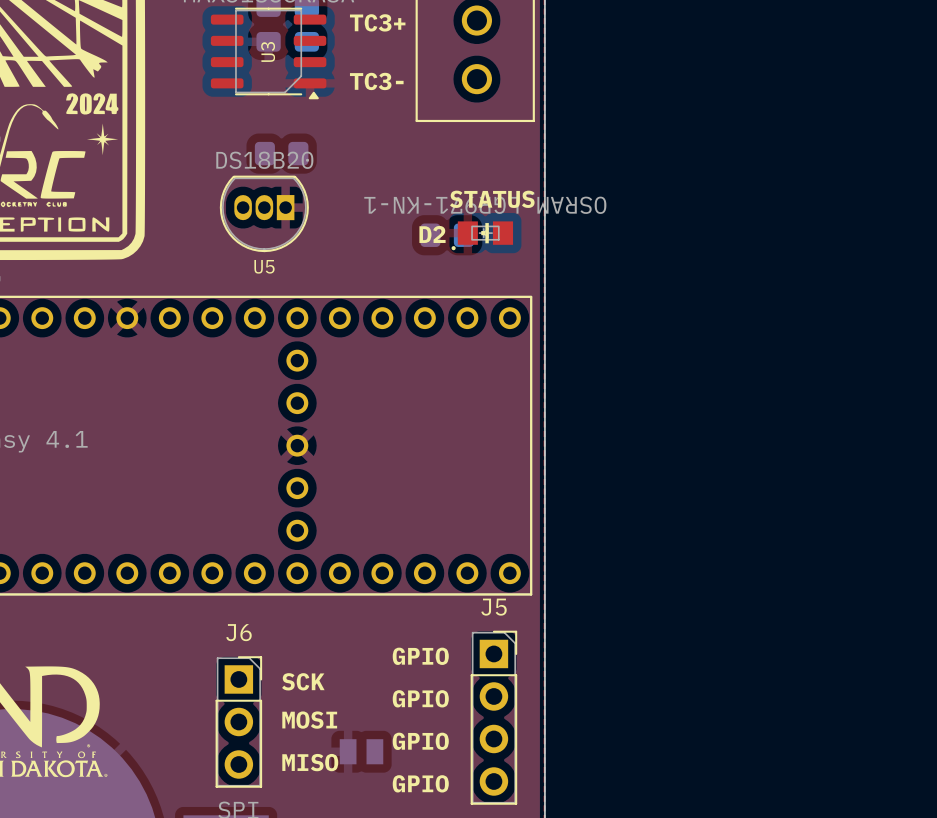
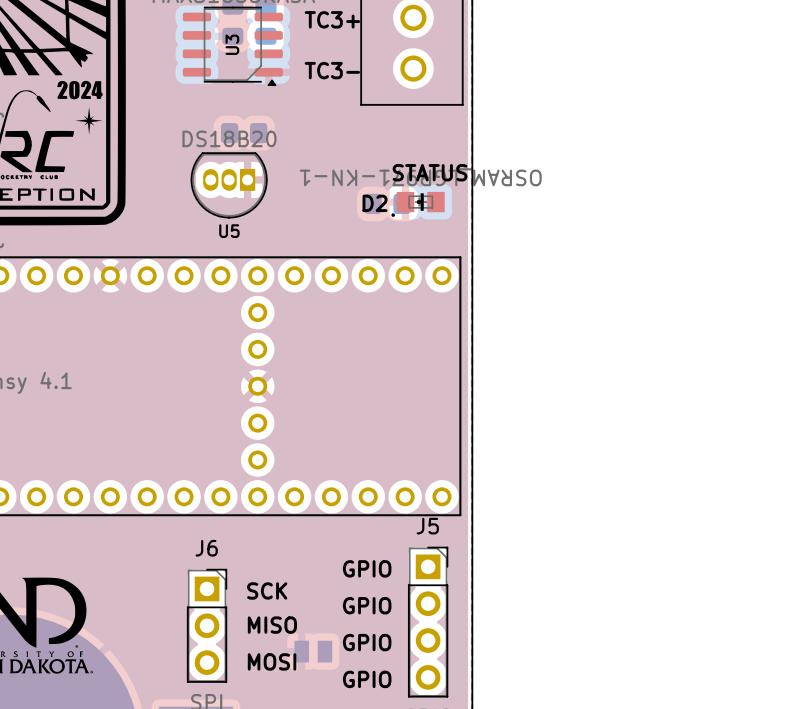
text: MOSI (309, 720) -> MISO (272, 625)
text: MISO (310, 762) -> MOSI (272, 661)

